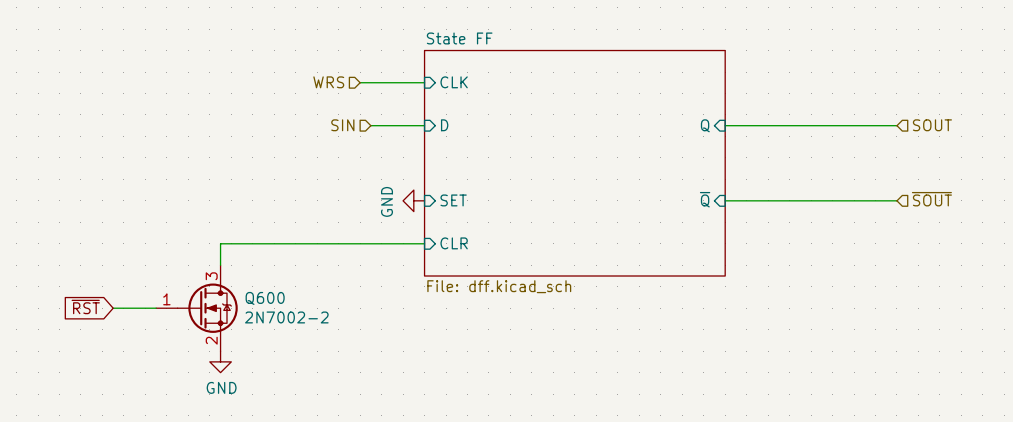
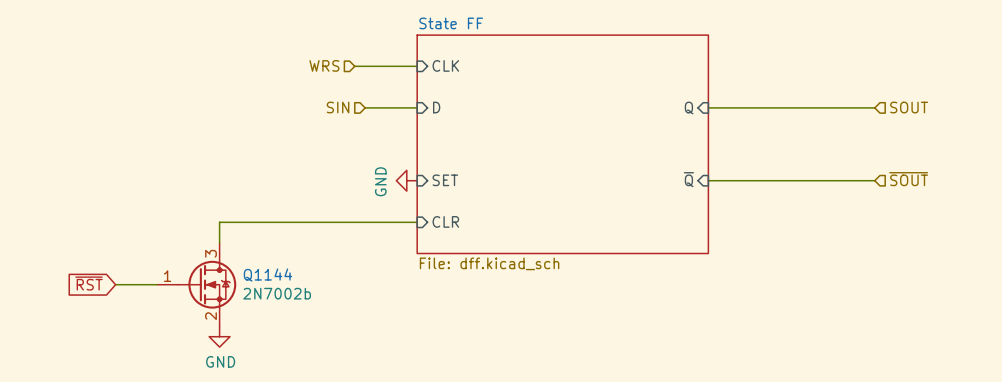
Q600 name: Q600 (265, 298) -> Q1144 (267, 275)
Q600 value: 2N7002-2 (286, 317) -> 2N7002b (277, 293)

